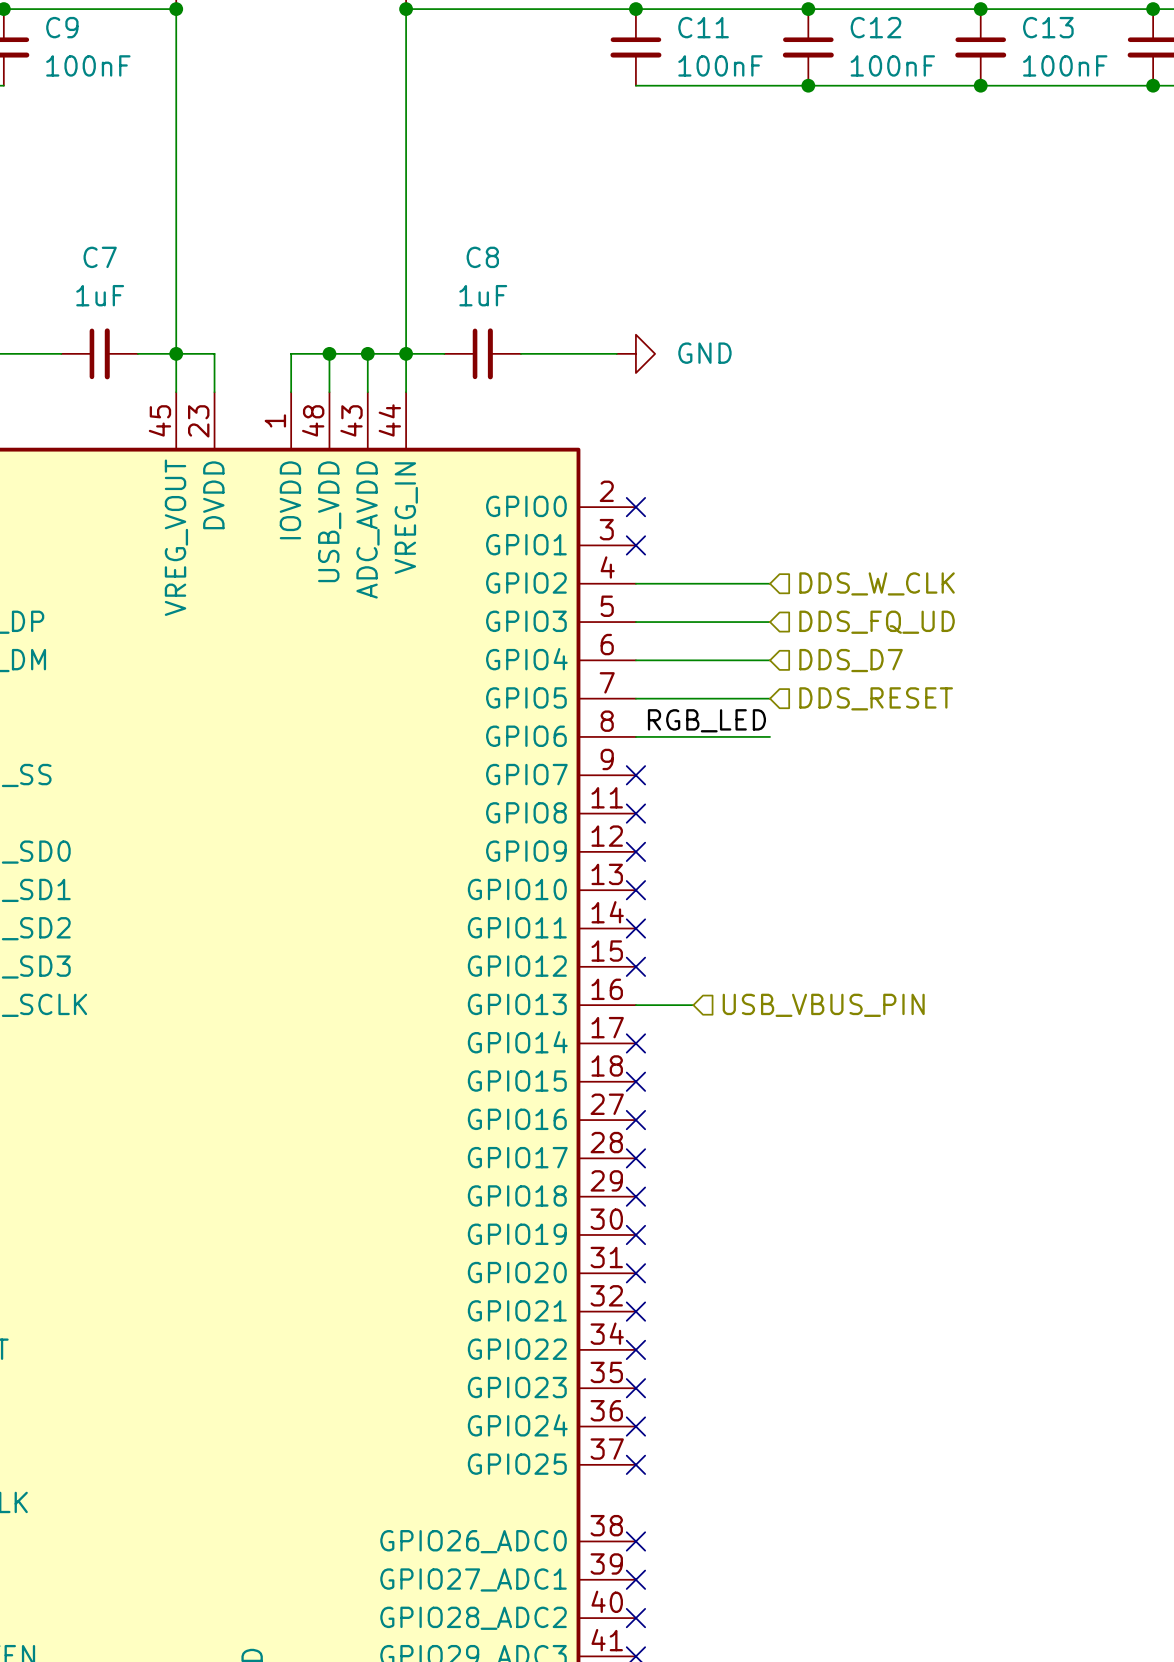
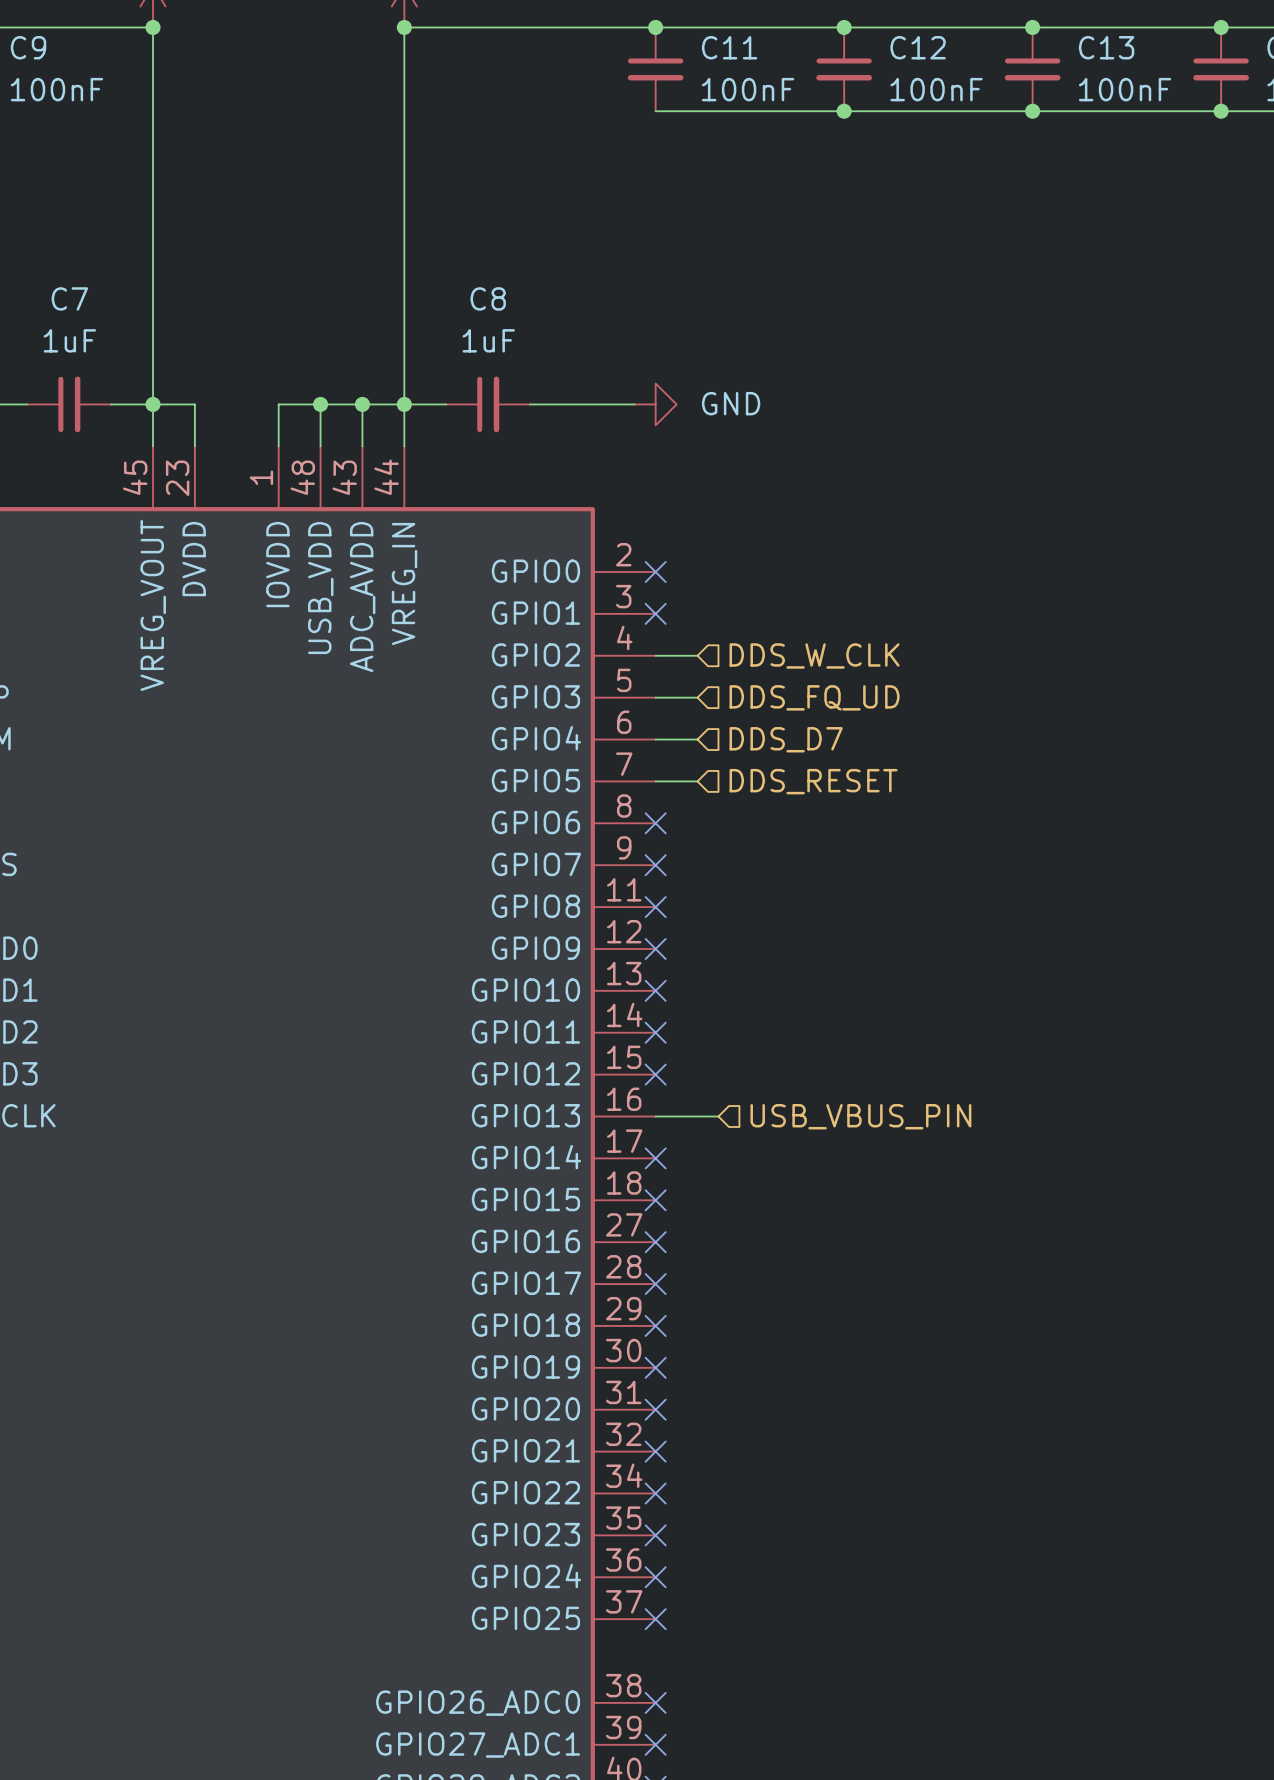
wire: (674, 583) (770, 583) -> none
hierarchical label position: DDS_W_CLK (877, 583) -> DDS_W_CLK (814, 655)
wire: (674, 622) (770, 622) -> none
hierarchical label position: DDS_FQ_UD (877, 622) -> DDS_FQ_UD (814, 697)
wire: (674, 660) (770, 660) -> none
hierarchical label position: DDS_D7 (851, 660) -> DDS_D7 (786, 739)
wire: (674, 698) (770, 698) -> none
hierarchical label position: DDS_RESET (876, 698) -> DDS_RESET (813, 781)
label: RGB_LED (706, 720) -> none
wire: (635, 736) (770, 736) -> none
no-connect mark: none -> (655, 823)

